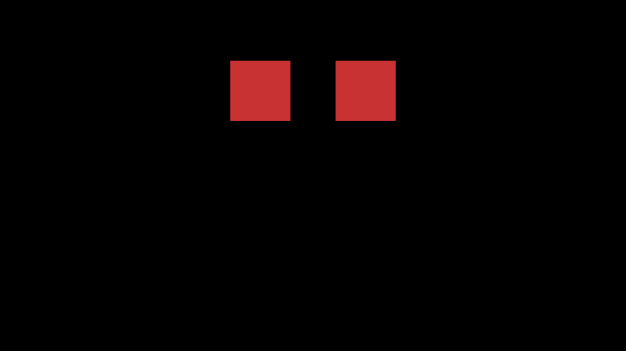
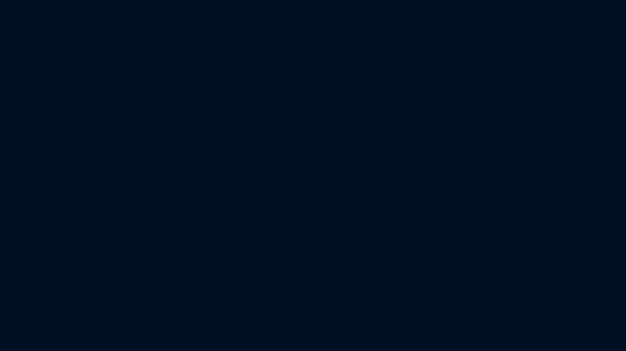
part: (312, 90) -> none

